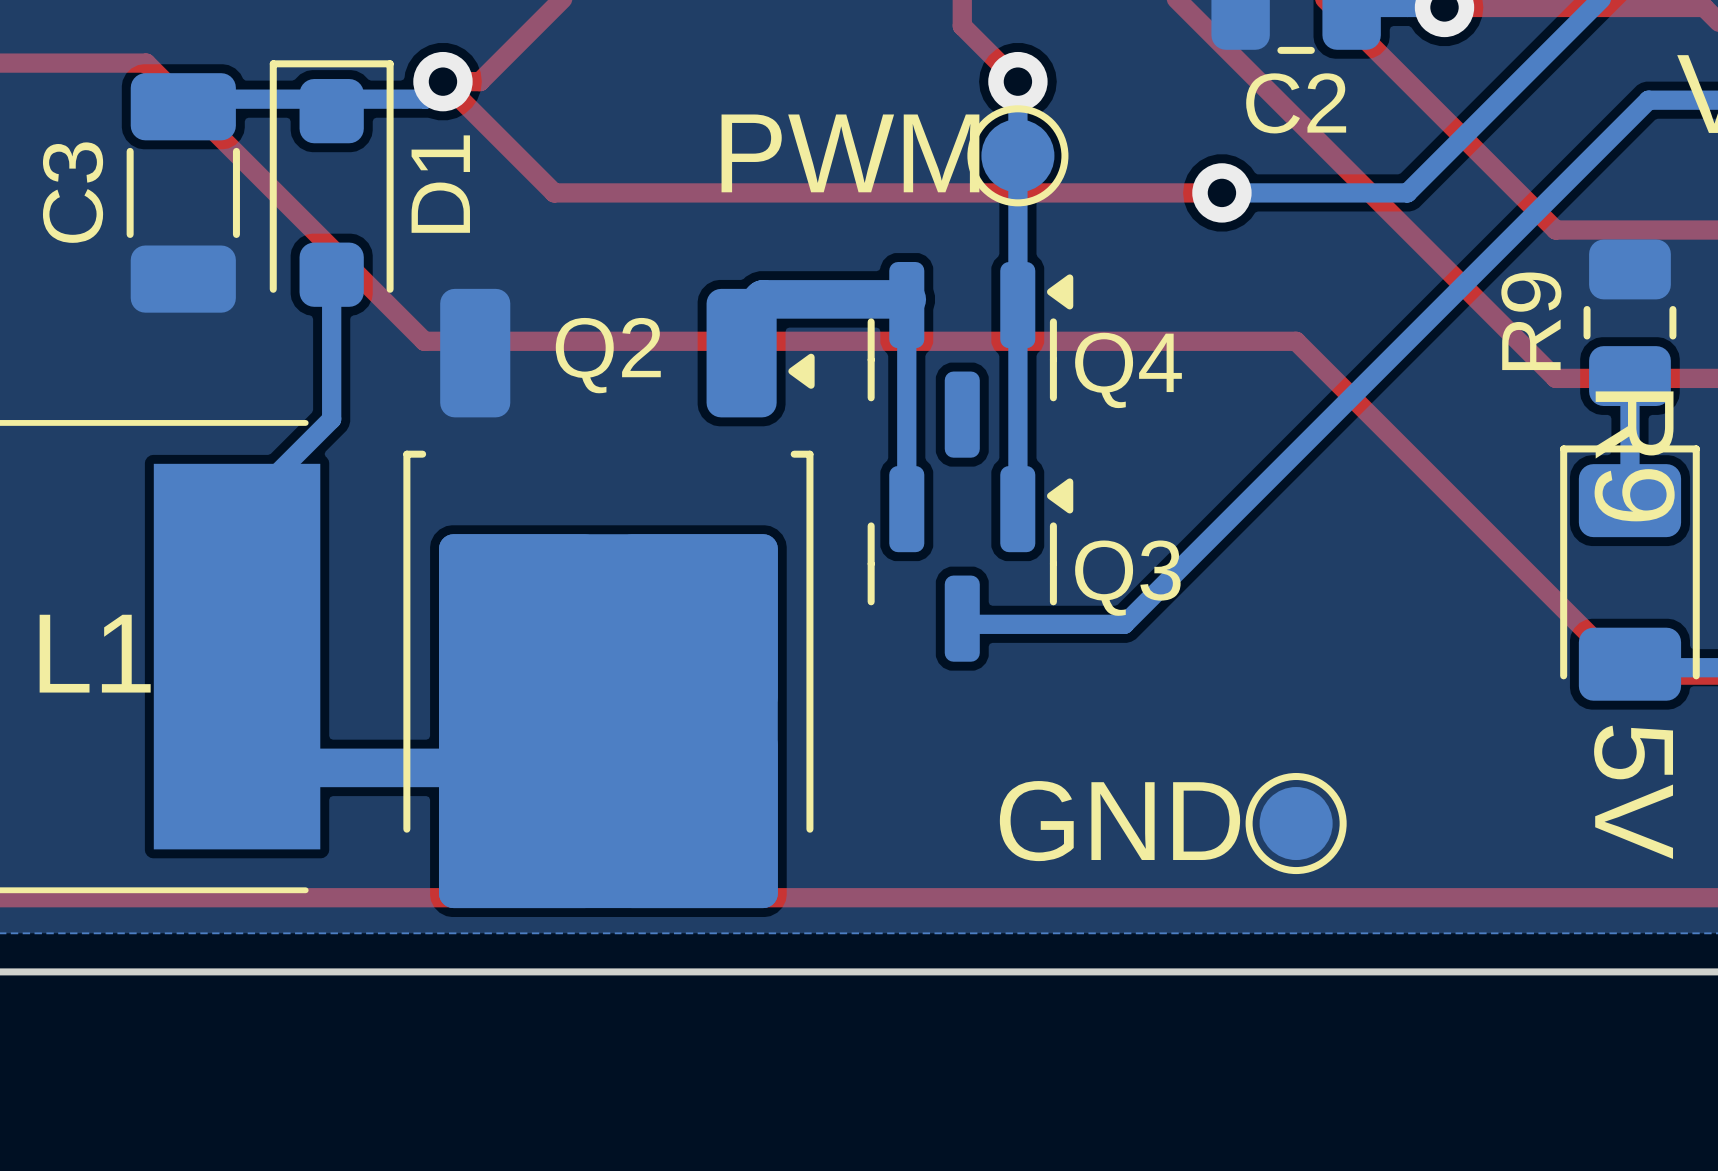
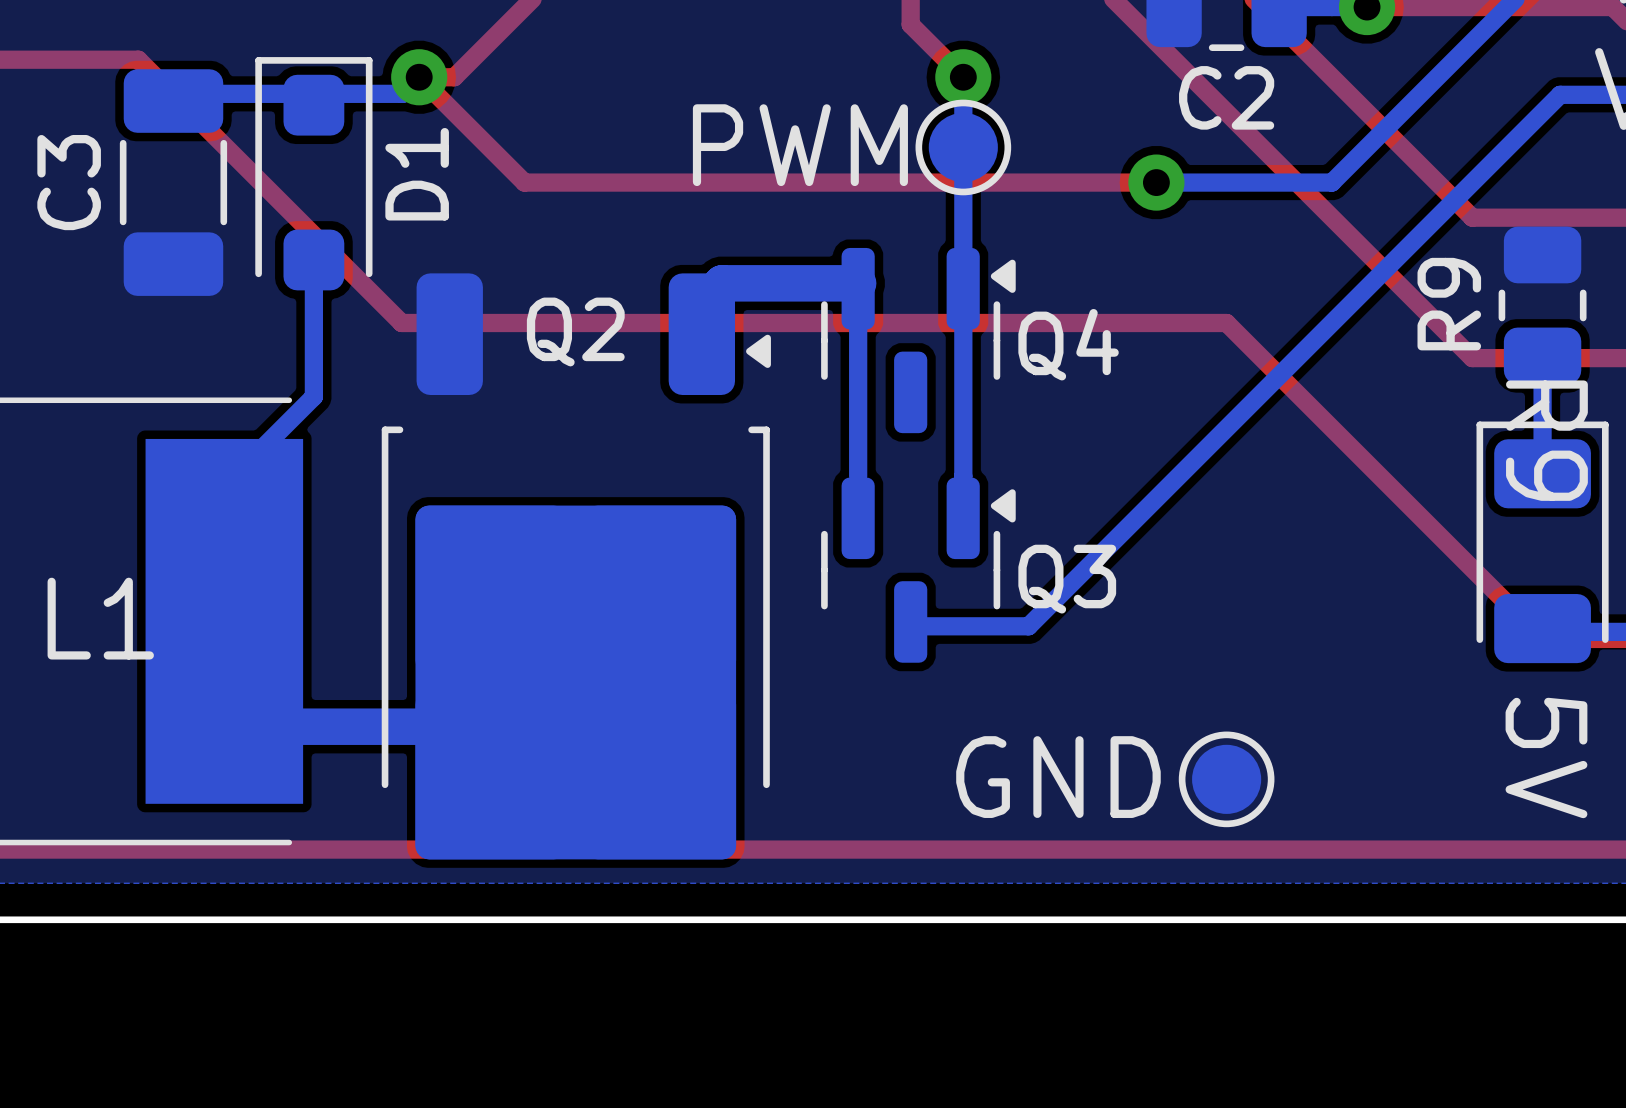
Q3 position: (970, 563) -> (918, 570)
bottom track: (1124, 624) (962, 624) -> (1064, 590) (1028, 626) (915, 626) (910, 621)

